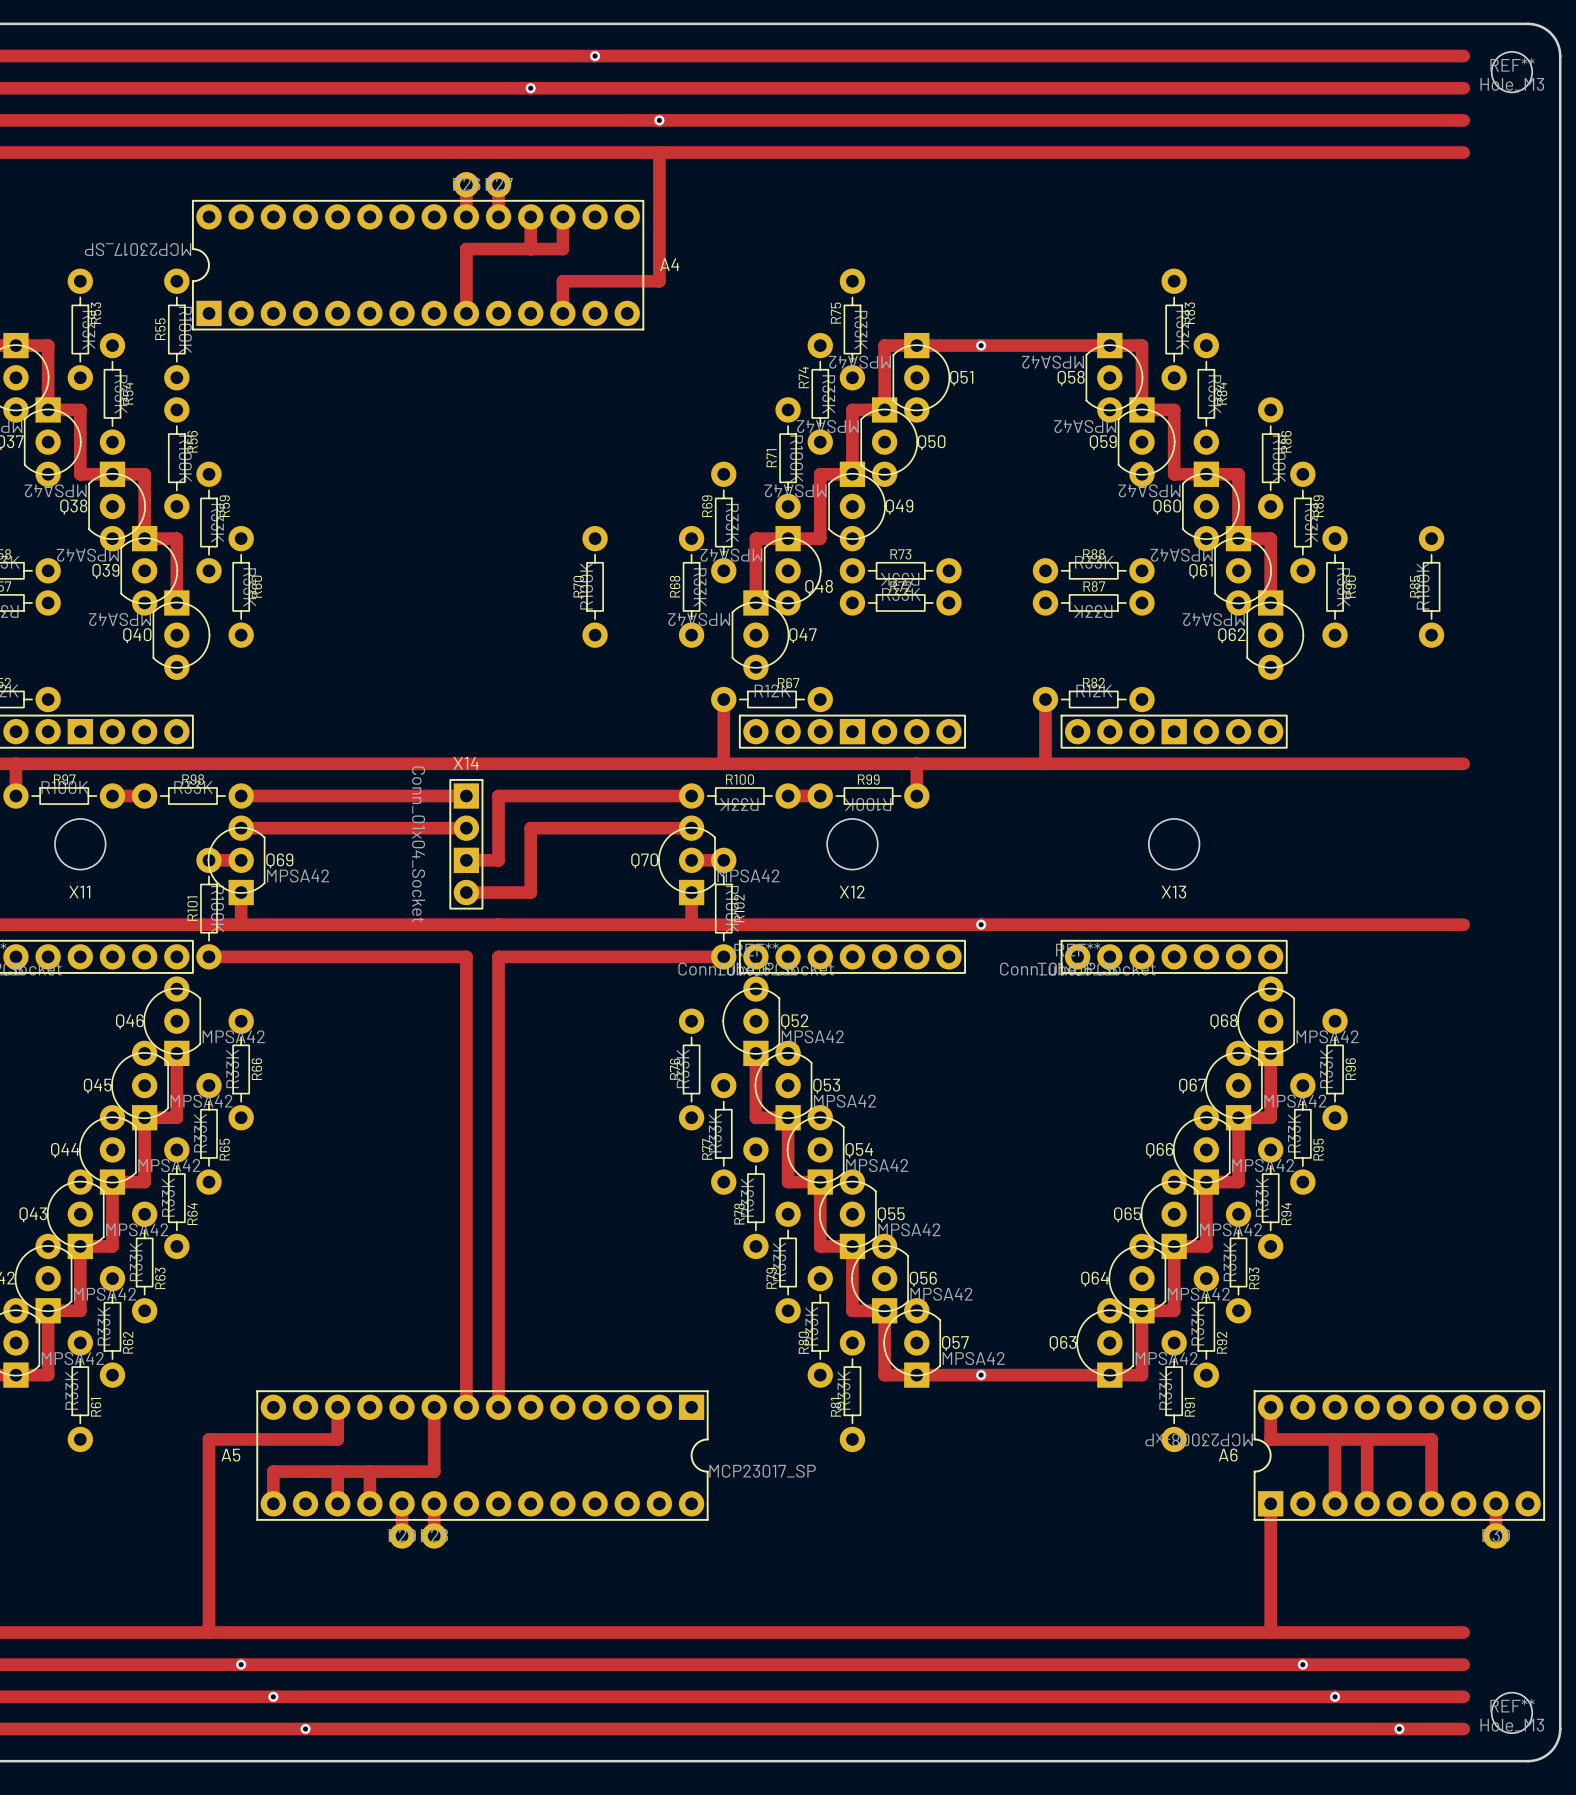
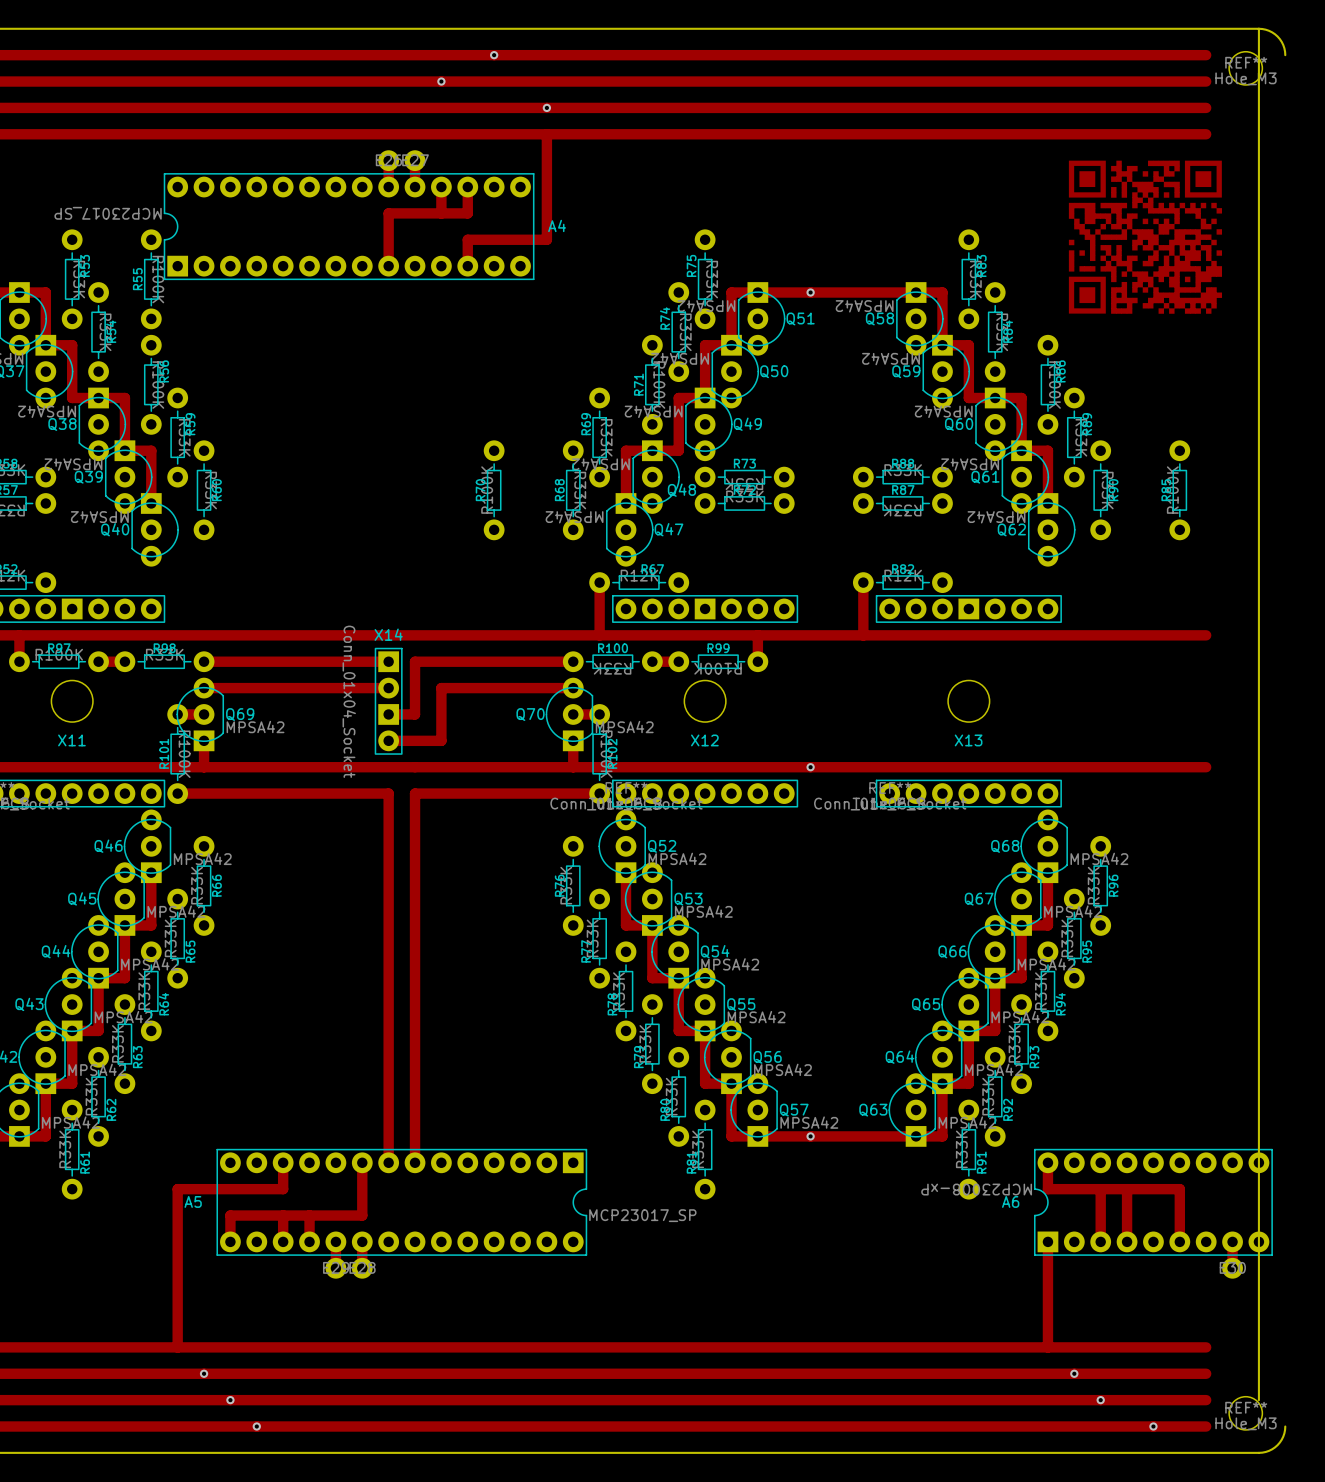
board edge: (1560, 56) (1560, 1729) -> (1258, 28) (1258, 1400)
drawing: none -> [1068, 160, 1223, 314]

